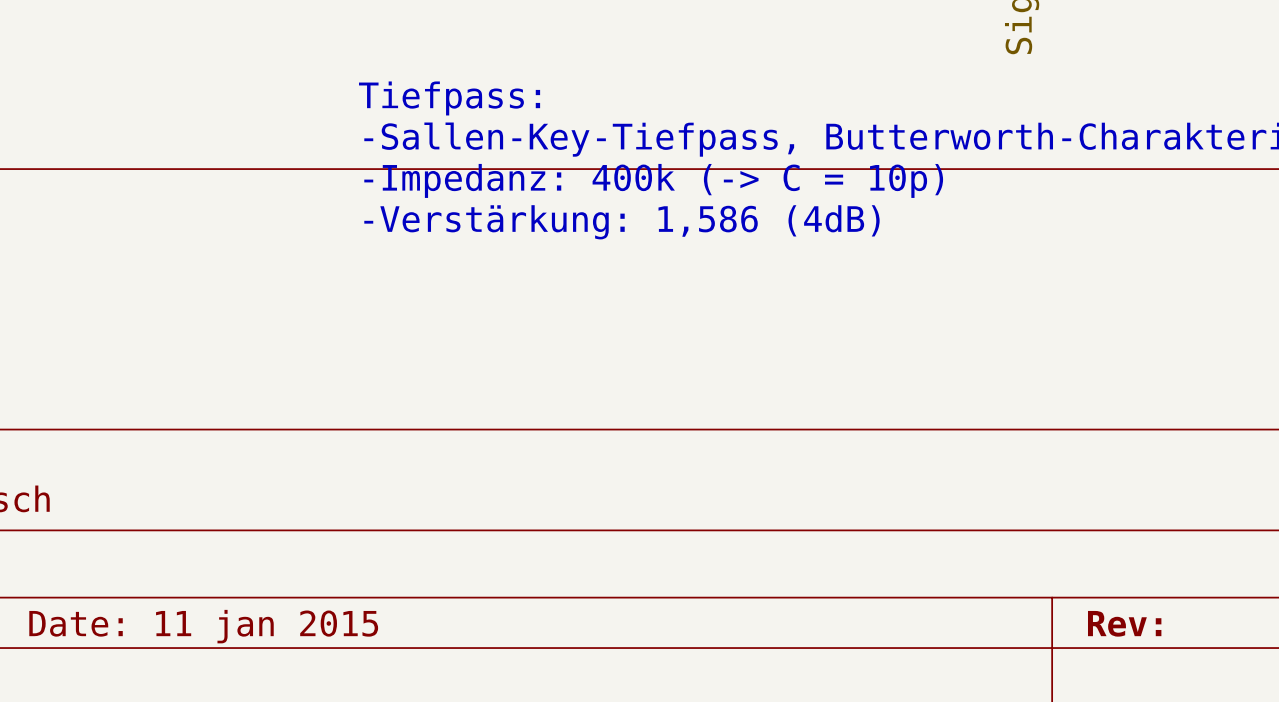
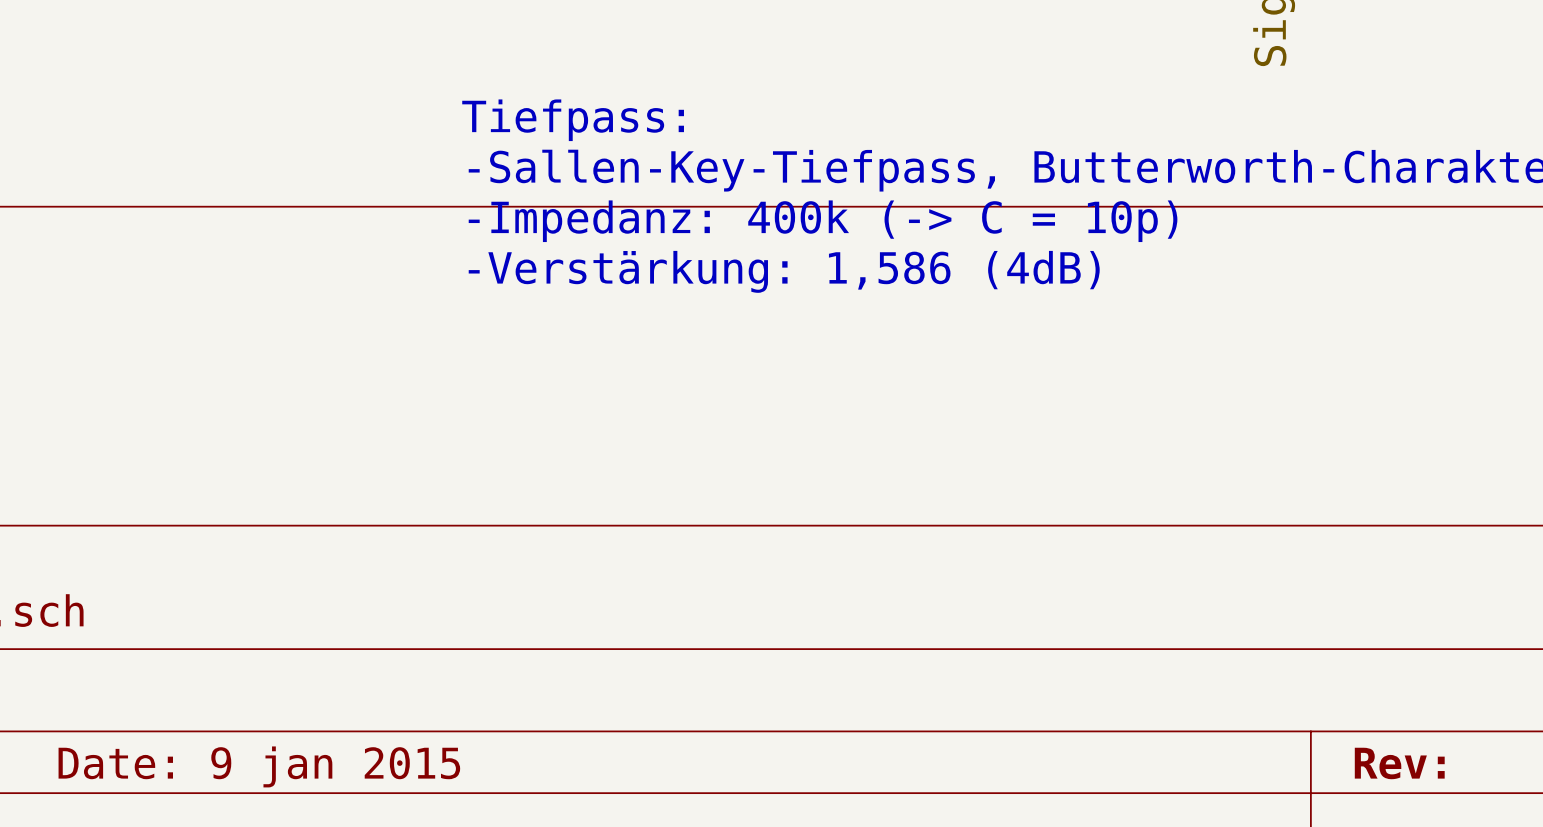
title block: Date: 11 jan 2015 (203, 626) -> Date: 9 jan 2015 (259, 766)

